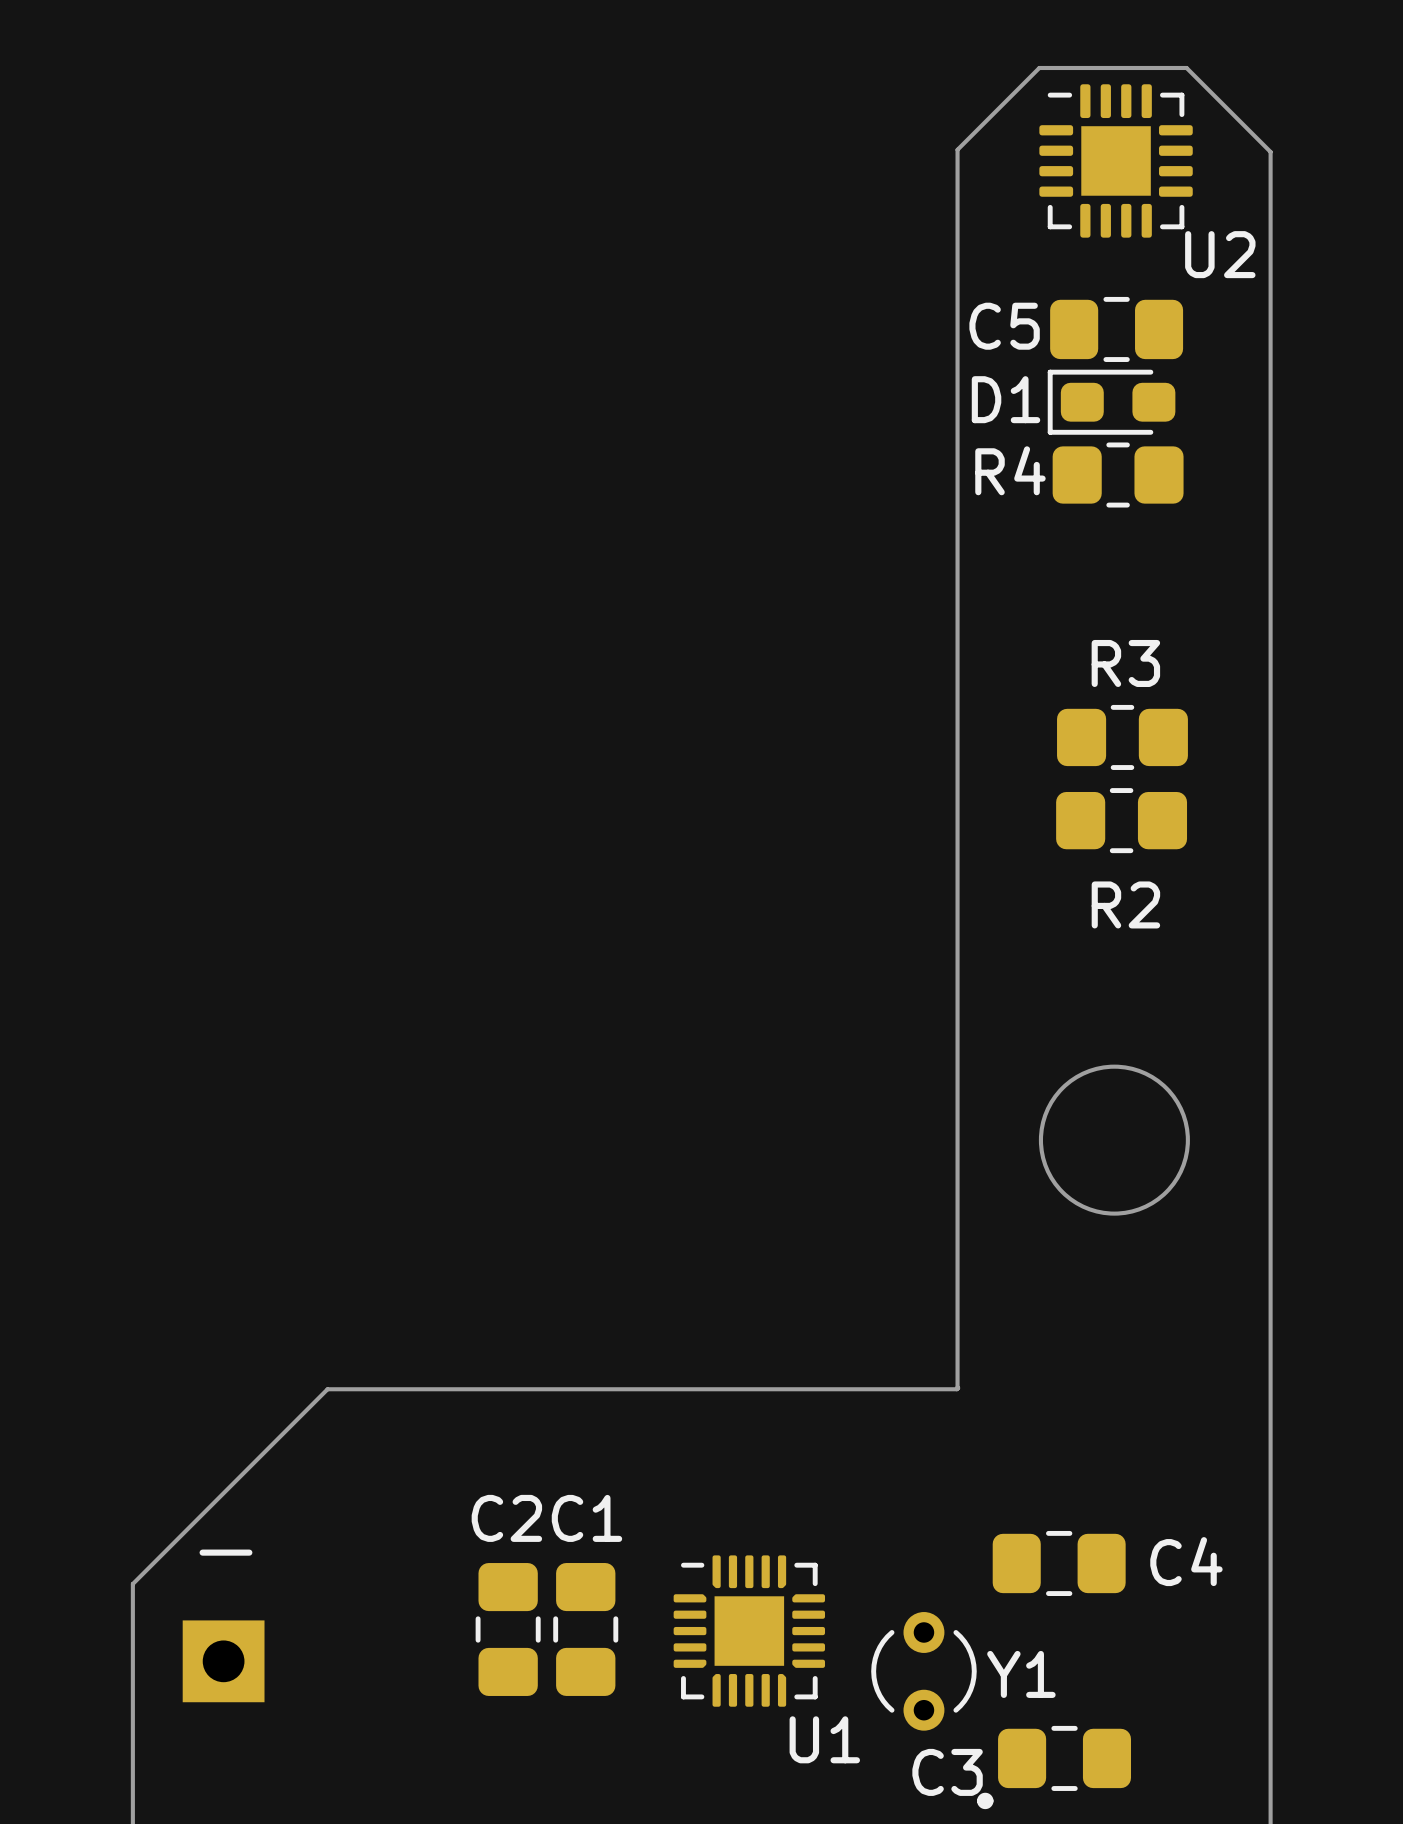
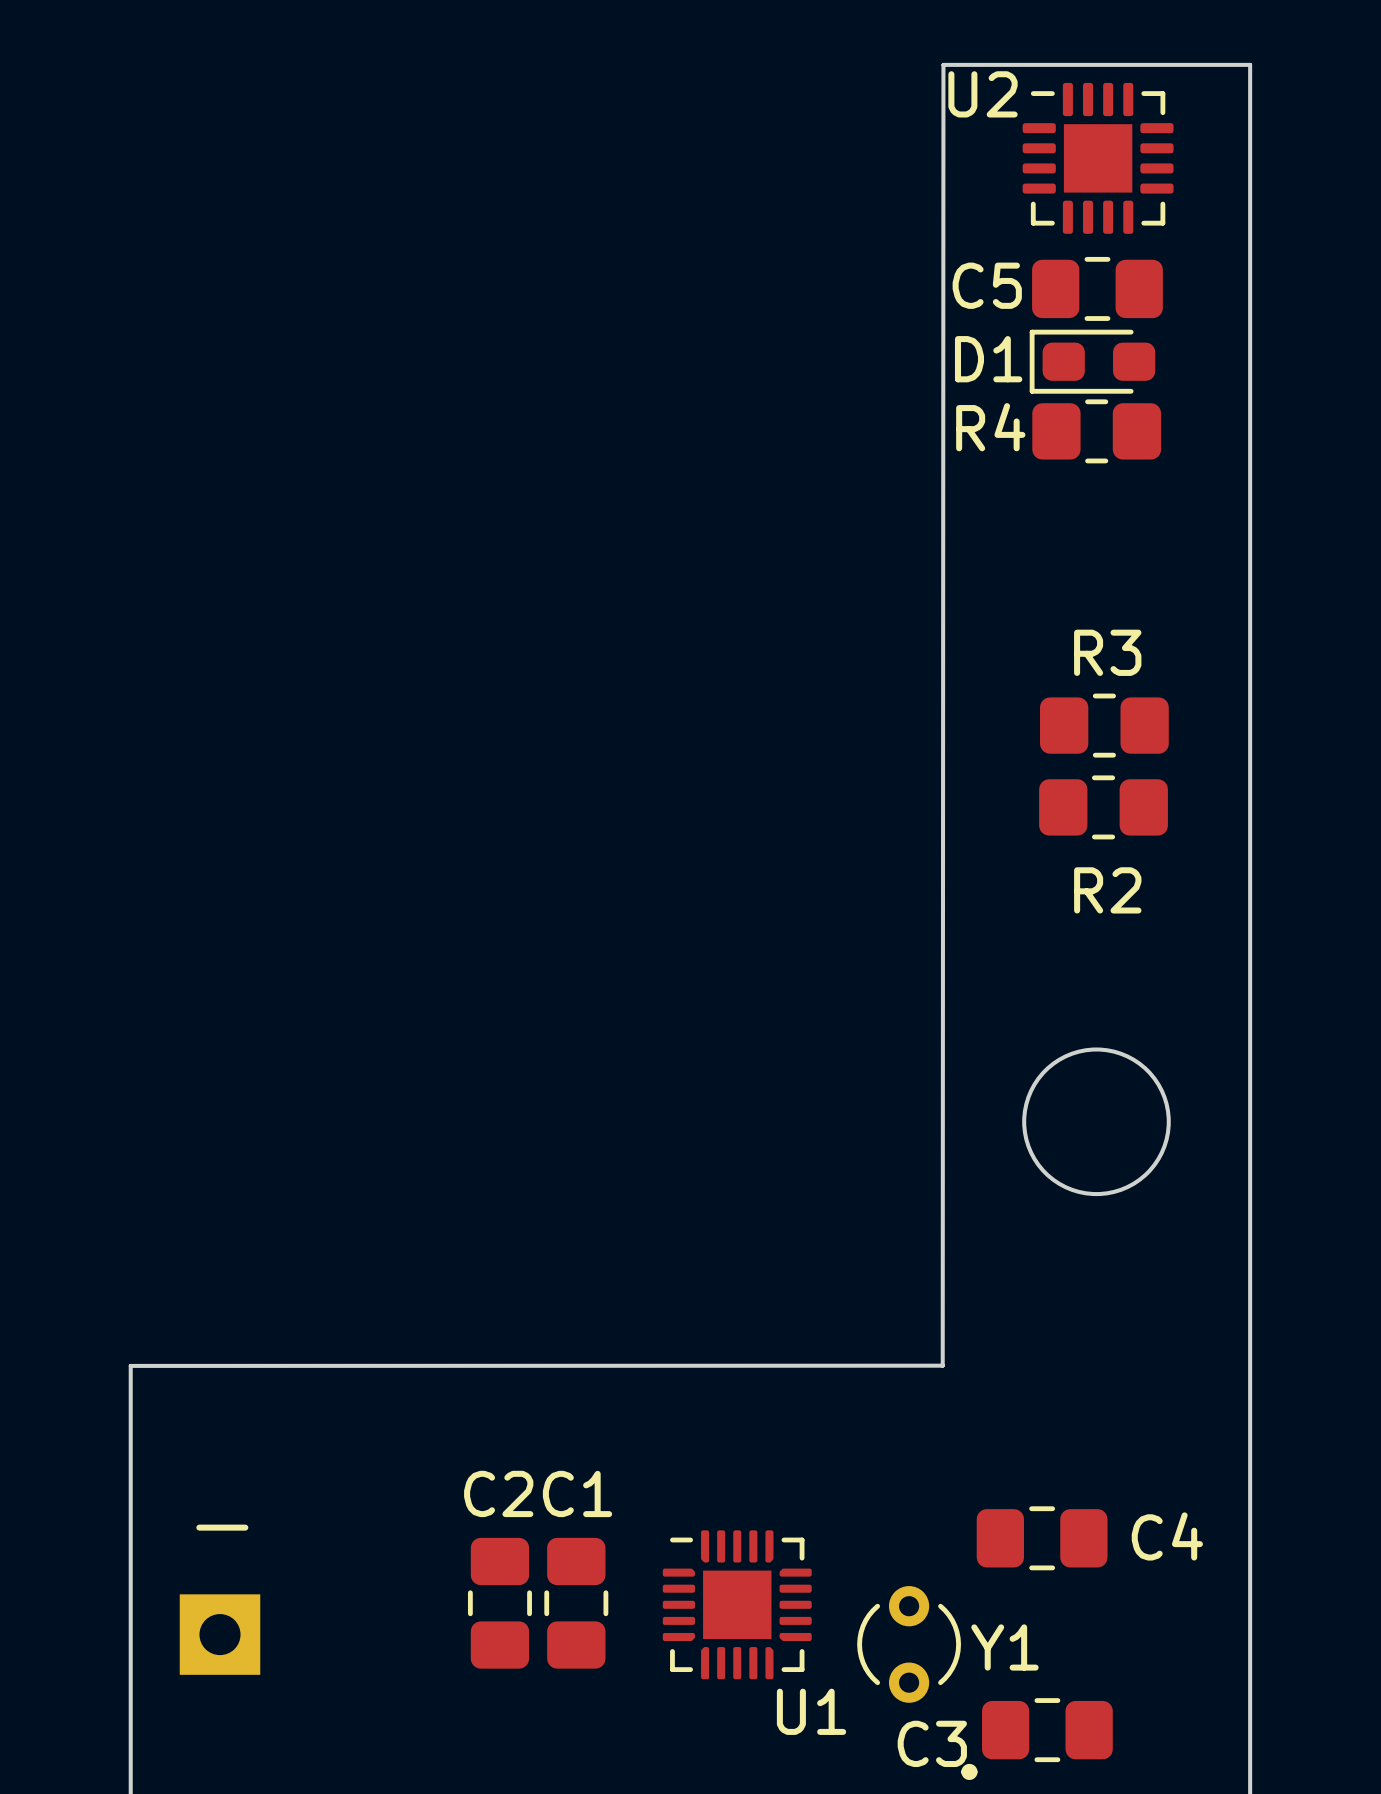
board edge: (1270, 151) (1186, 67) (1039, 67) (957, 149) (958, 1388) (327, 1389) (132, 1583) -> (1250, 149) (1250, 64) (943, 64) (942, 1365) (130, 1365) (130, 1558)
U2 name position: U2 (1220, 254) -> U2 (983, 94)
C5 position: (1116, 329) -> (1097, 288)
D1 position: (1111, 402) -> (1092, 361)
R4 position: (1118, 475) -> (1096, 431)

